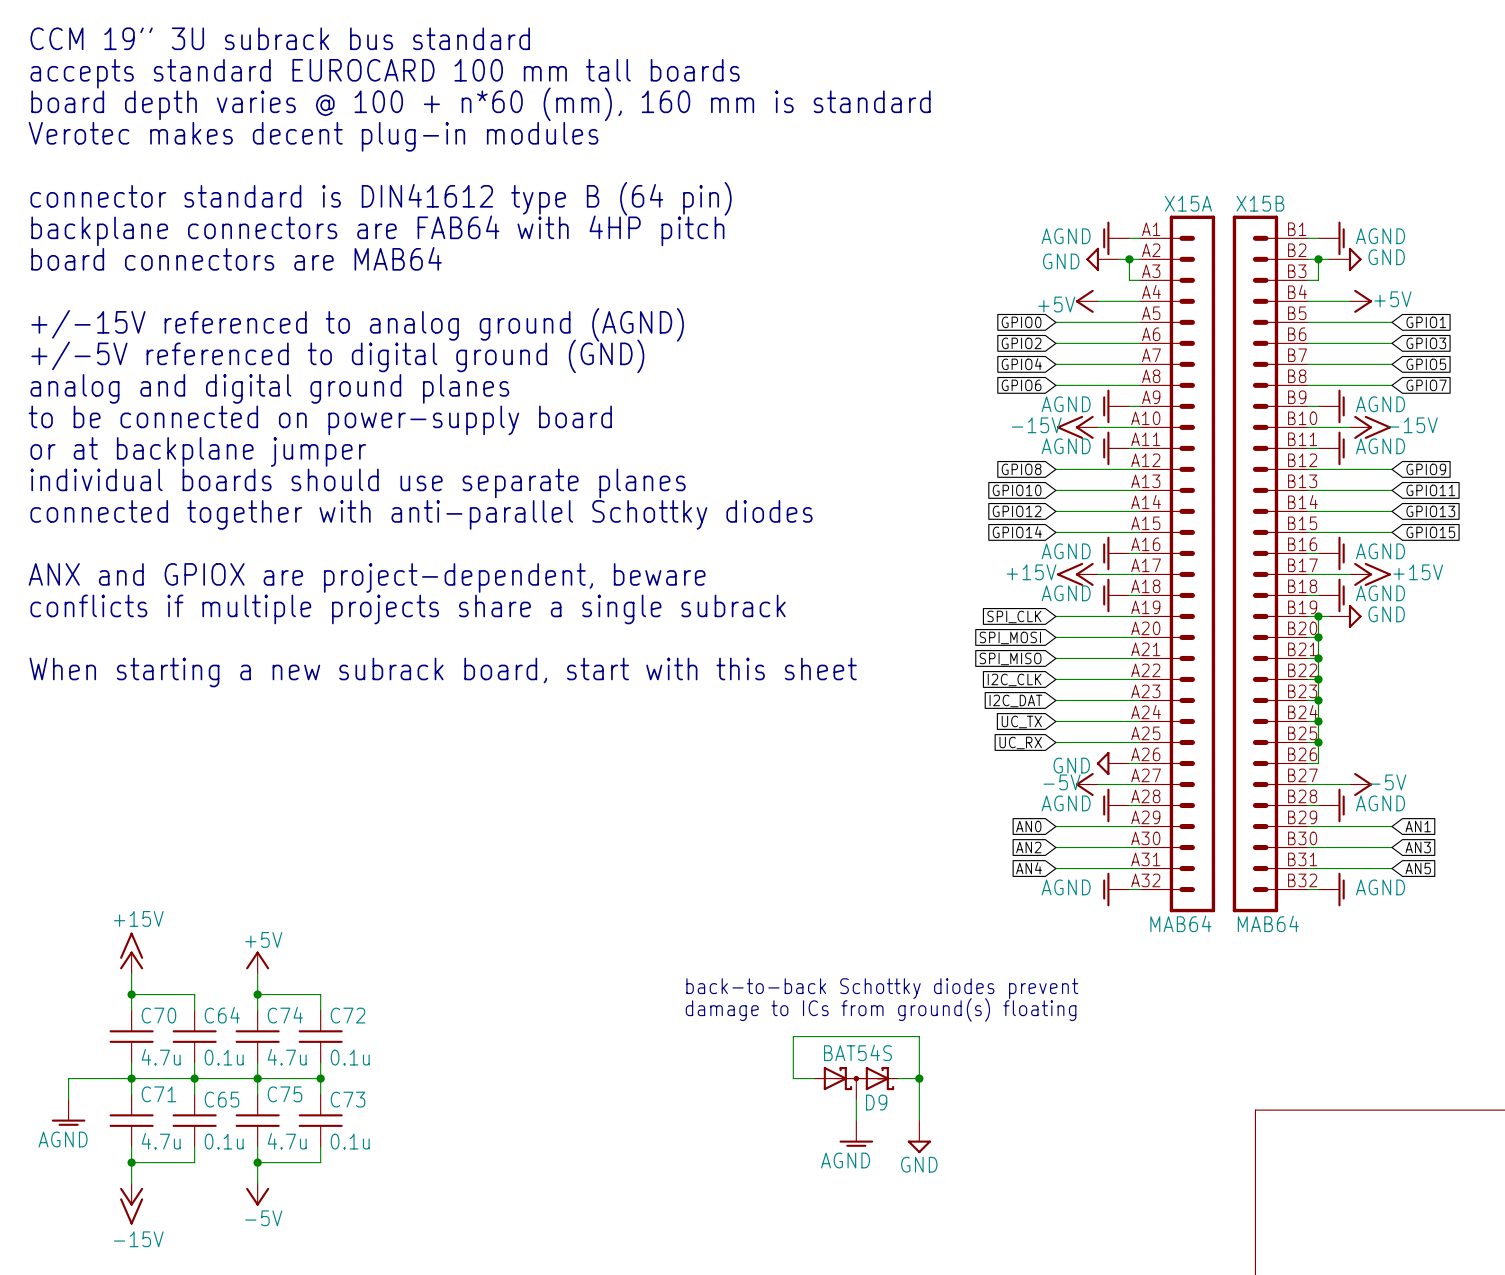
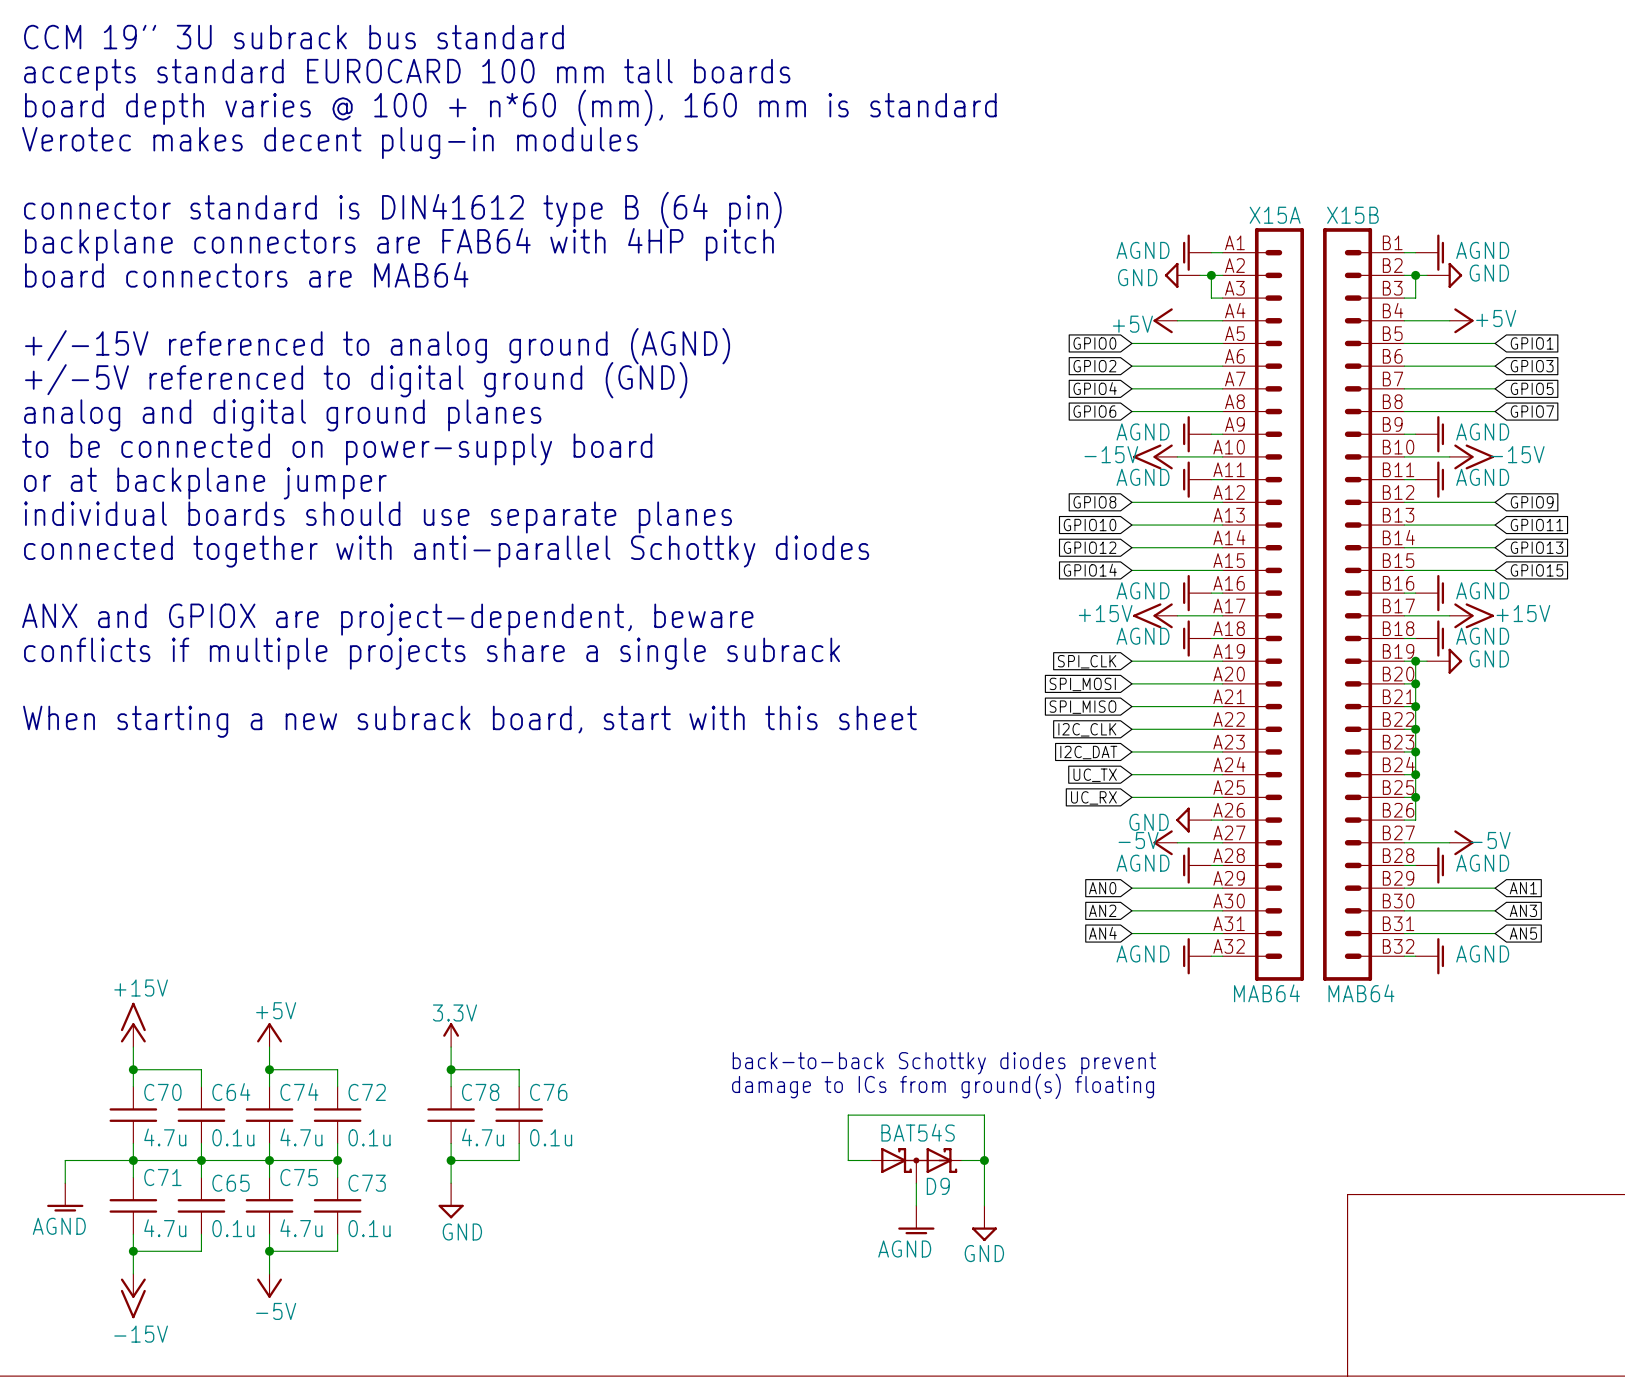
power symbol: none -> 3.3V (451, 1035)
wire: none -> (451, 1047) (451, 1086)
wire: none -> (451, 1069) (519, 1069) (519, 1086)
junction: none -> (451, 1069)
C78: none -> 4.7u (451, 1115)
C76: none -> 0.1u (519, 1115)
wire: none -> (451, 1143) (451, 1183)
wire: none -> (519, 1143) (519, 1160) (451, 1160)
junction: none -> (451, 1160)
power symbol: none -> GND (451, 1200)

